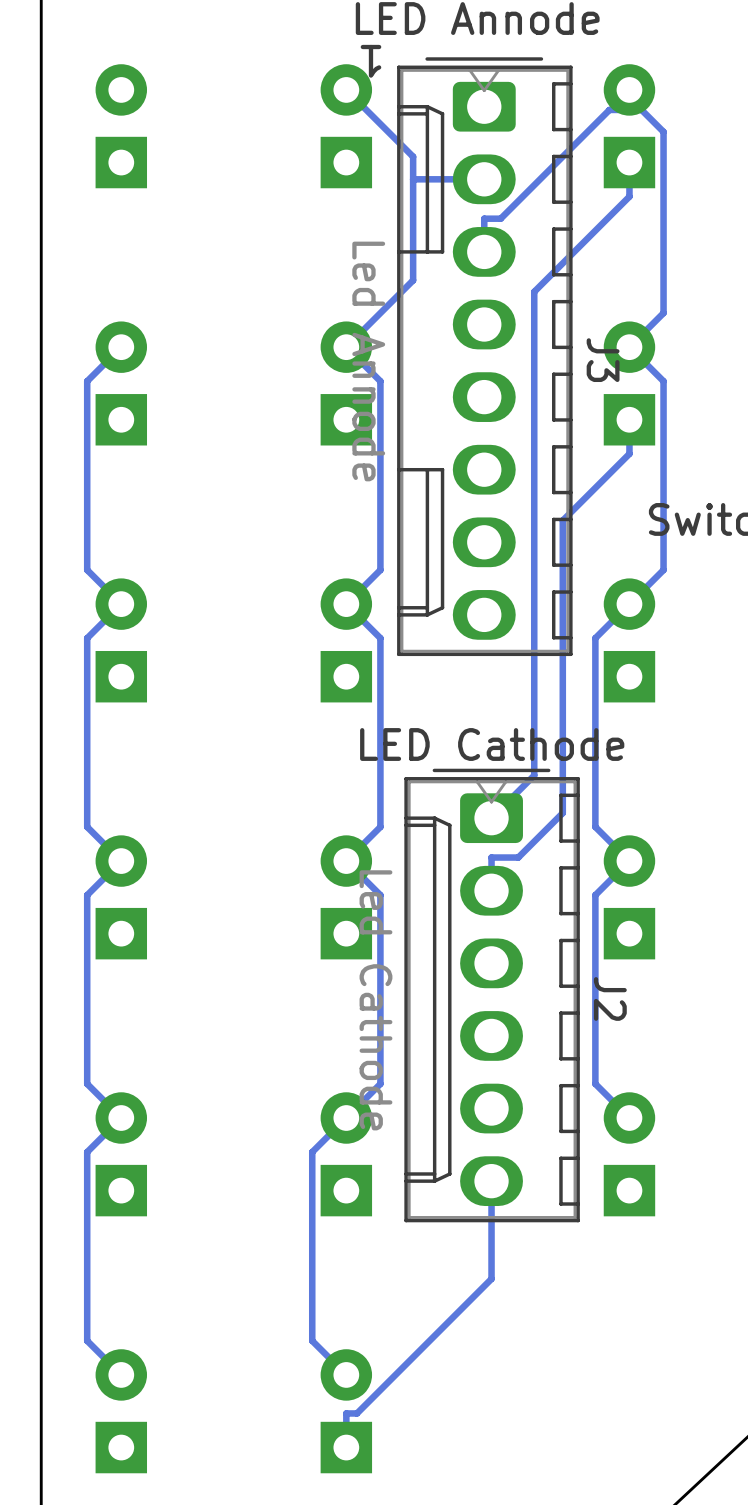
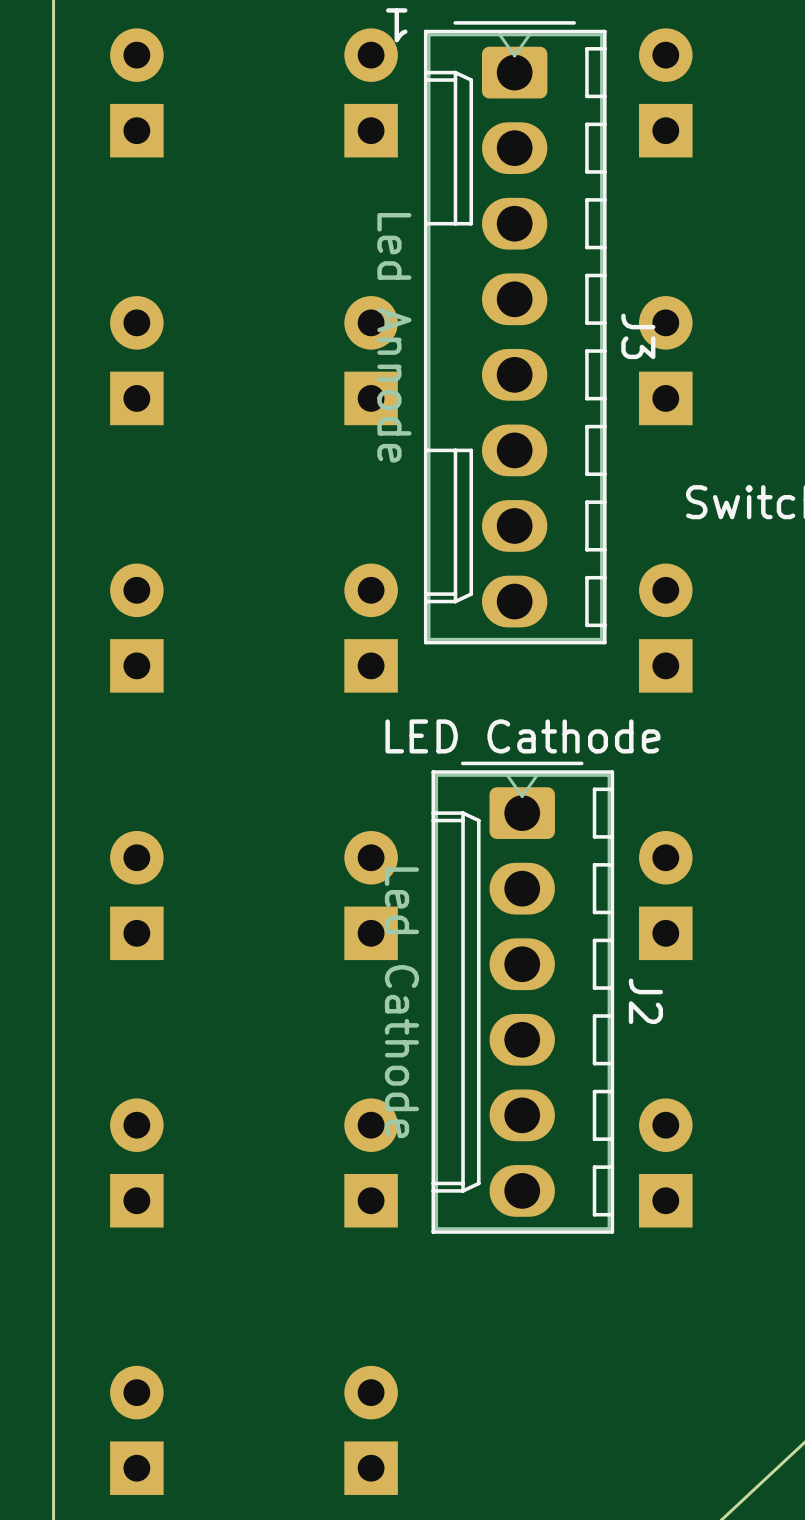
track: (346, 89) (413, 156) (413, 280) (346, 347) (380, 381) (380, 570) (346, 604) (380, 638) (380, 826) (346, 861) (380, 895) (380, 1083) (312, 1152) (312, 1340) (346, 1374) -> none
track: (629, 162) (629, 196) (534, 291) (534, 775) (491, 818) -> none
track: (484, 179) (413, 179) -> none
track: (484, 251) (484, 218) (500, 218) (609, 109) (641, 109) (663, 131) (663, 313) (629, 347) (663, 381) (663, 570) (595, 638) (595, 826) (629, 861) (595, 895) (595, 1083) (629, 1118) -> none
track: (121, 347) (87, 381) (87, 570) (121, 604) (87, 638) (87, 826) (121, 861) (87, 895) (87, 1083) (121, 1118) (87, 1152) (87, 1340) (121, 1374) -> none
track: (629, 419) (629, 453) (562, 520) (562, 813) (518, 857) (491, 857) (491, 890) -> none
track: (491, 1181) (491, 1278) (356, 1413) (346, 1413) (346, 1447) -> none

